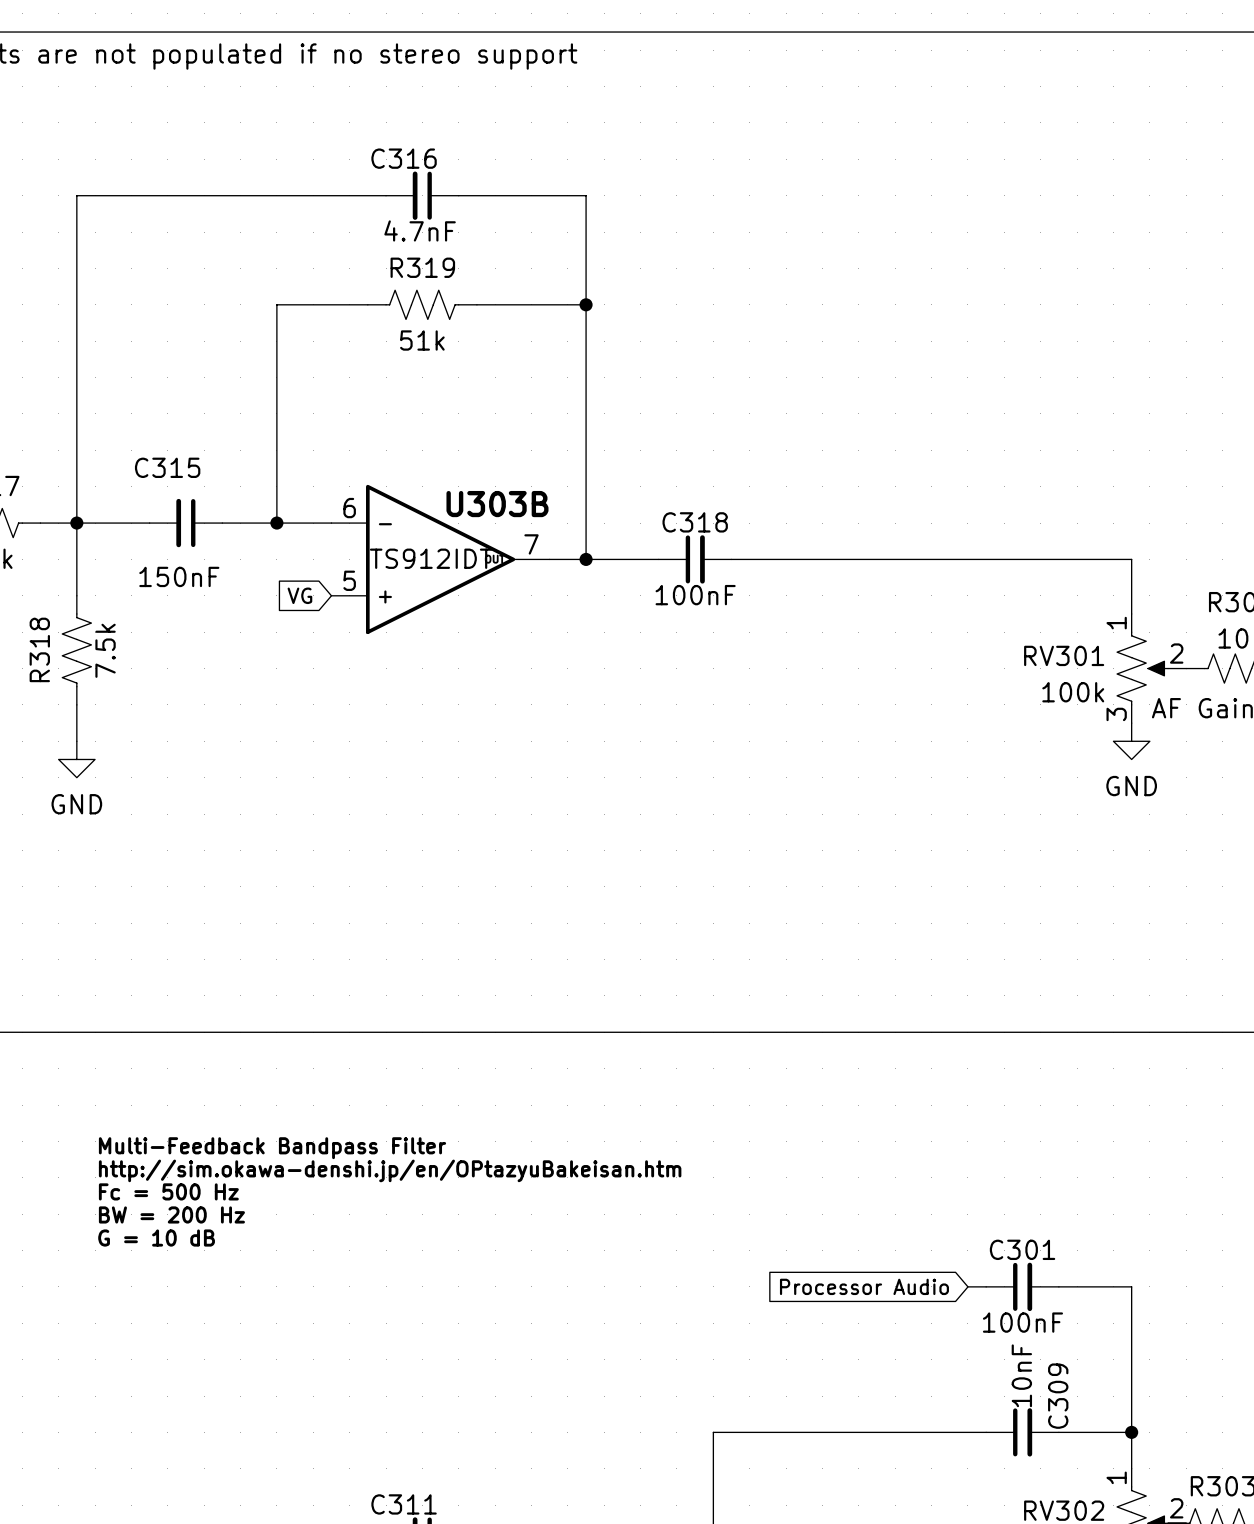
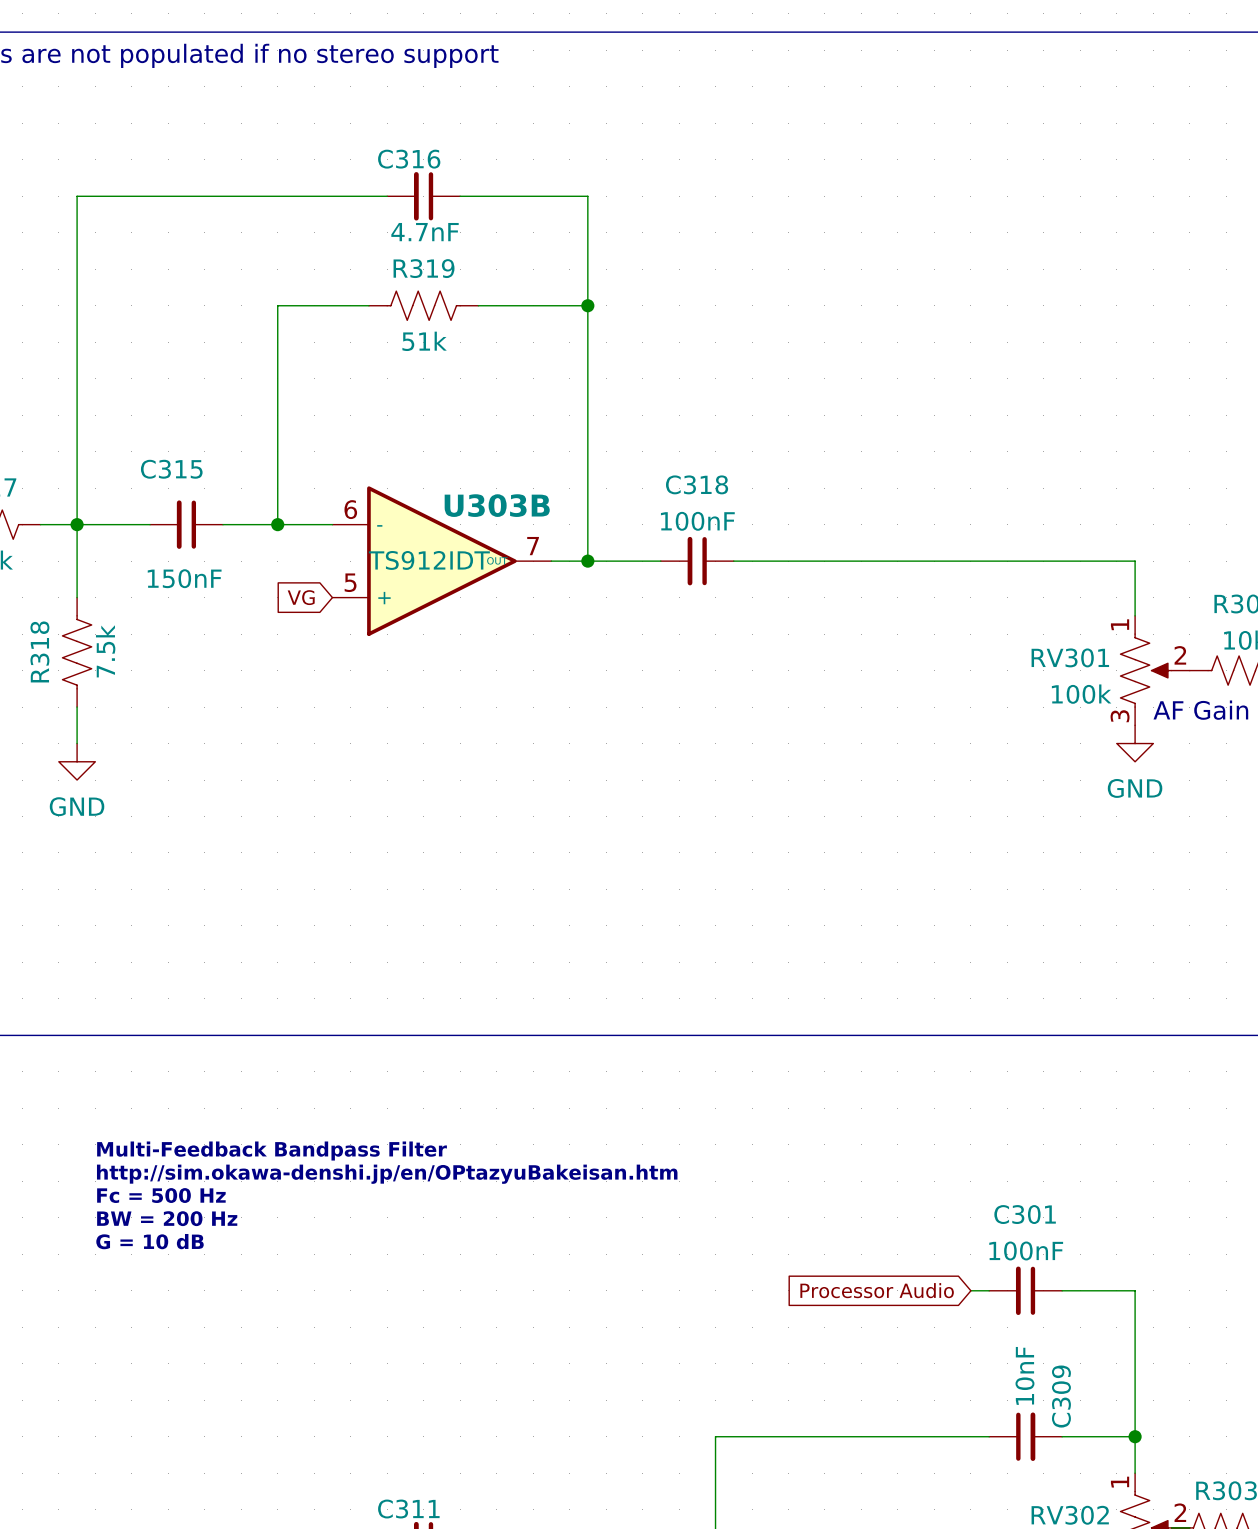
C318 name position: C318 (695, 522) -> C318 (697, 484)
C318 rotation: 0° (695, 559) -> 180° (697, 561)
C301 name position: C301 (1022, 1249) -> C301 (1025, 1214)
C301 rotation: 0° (1022, 1286) -> 180° (1025, 1290)

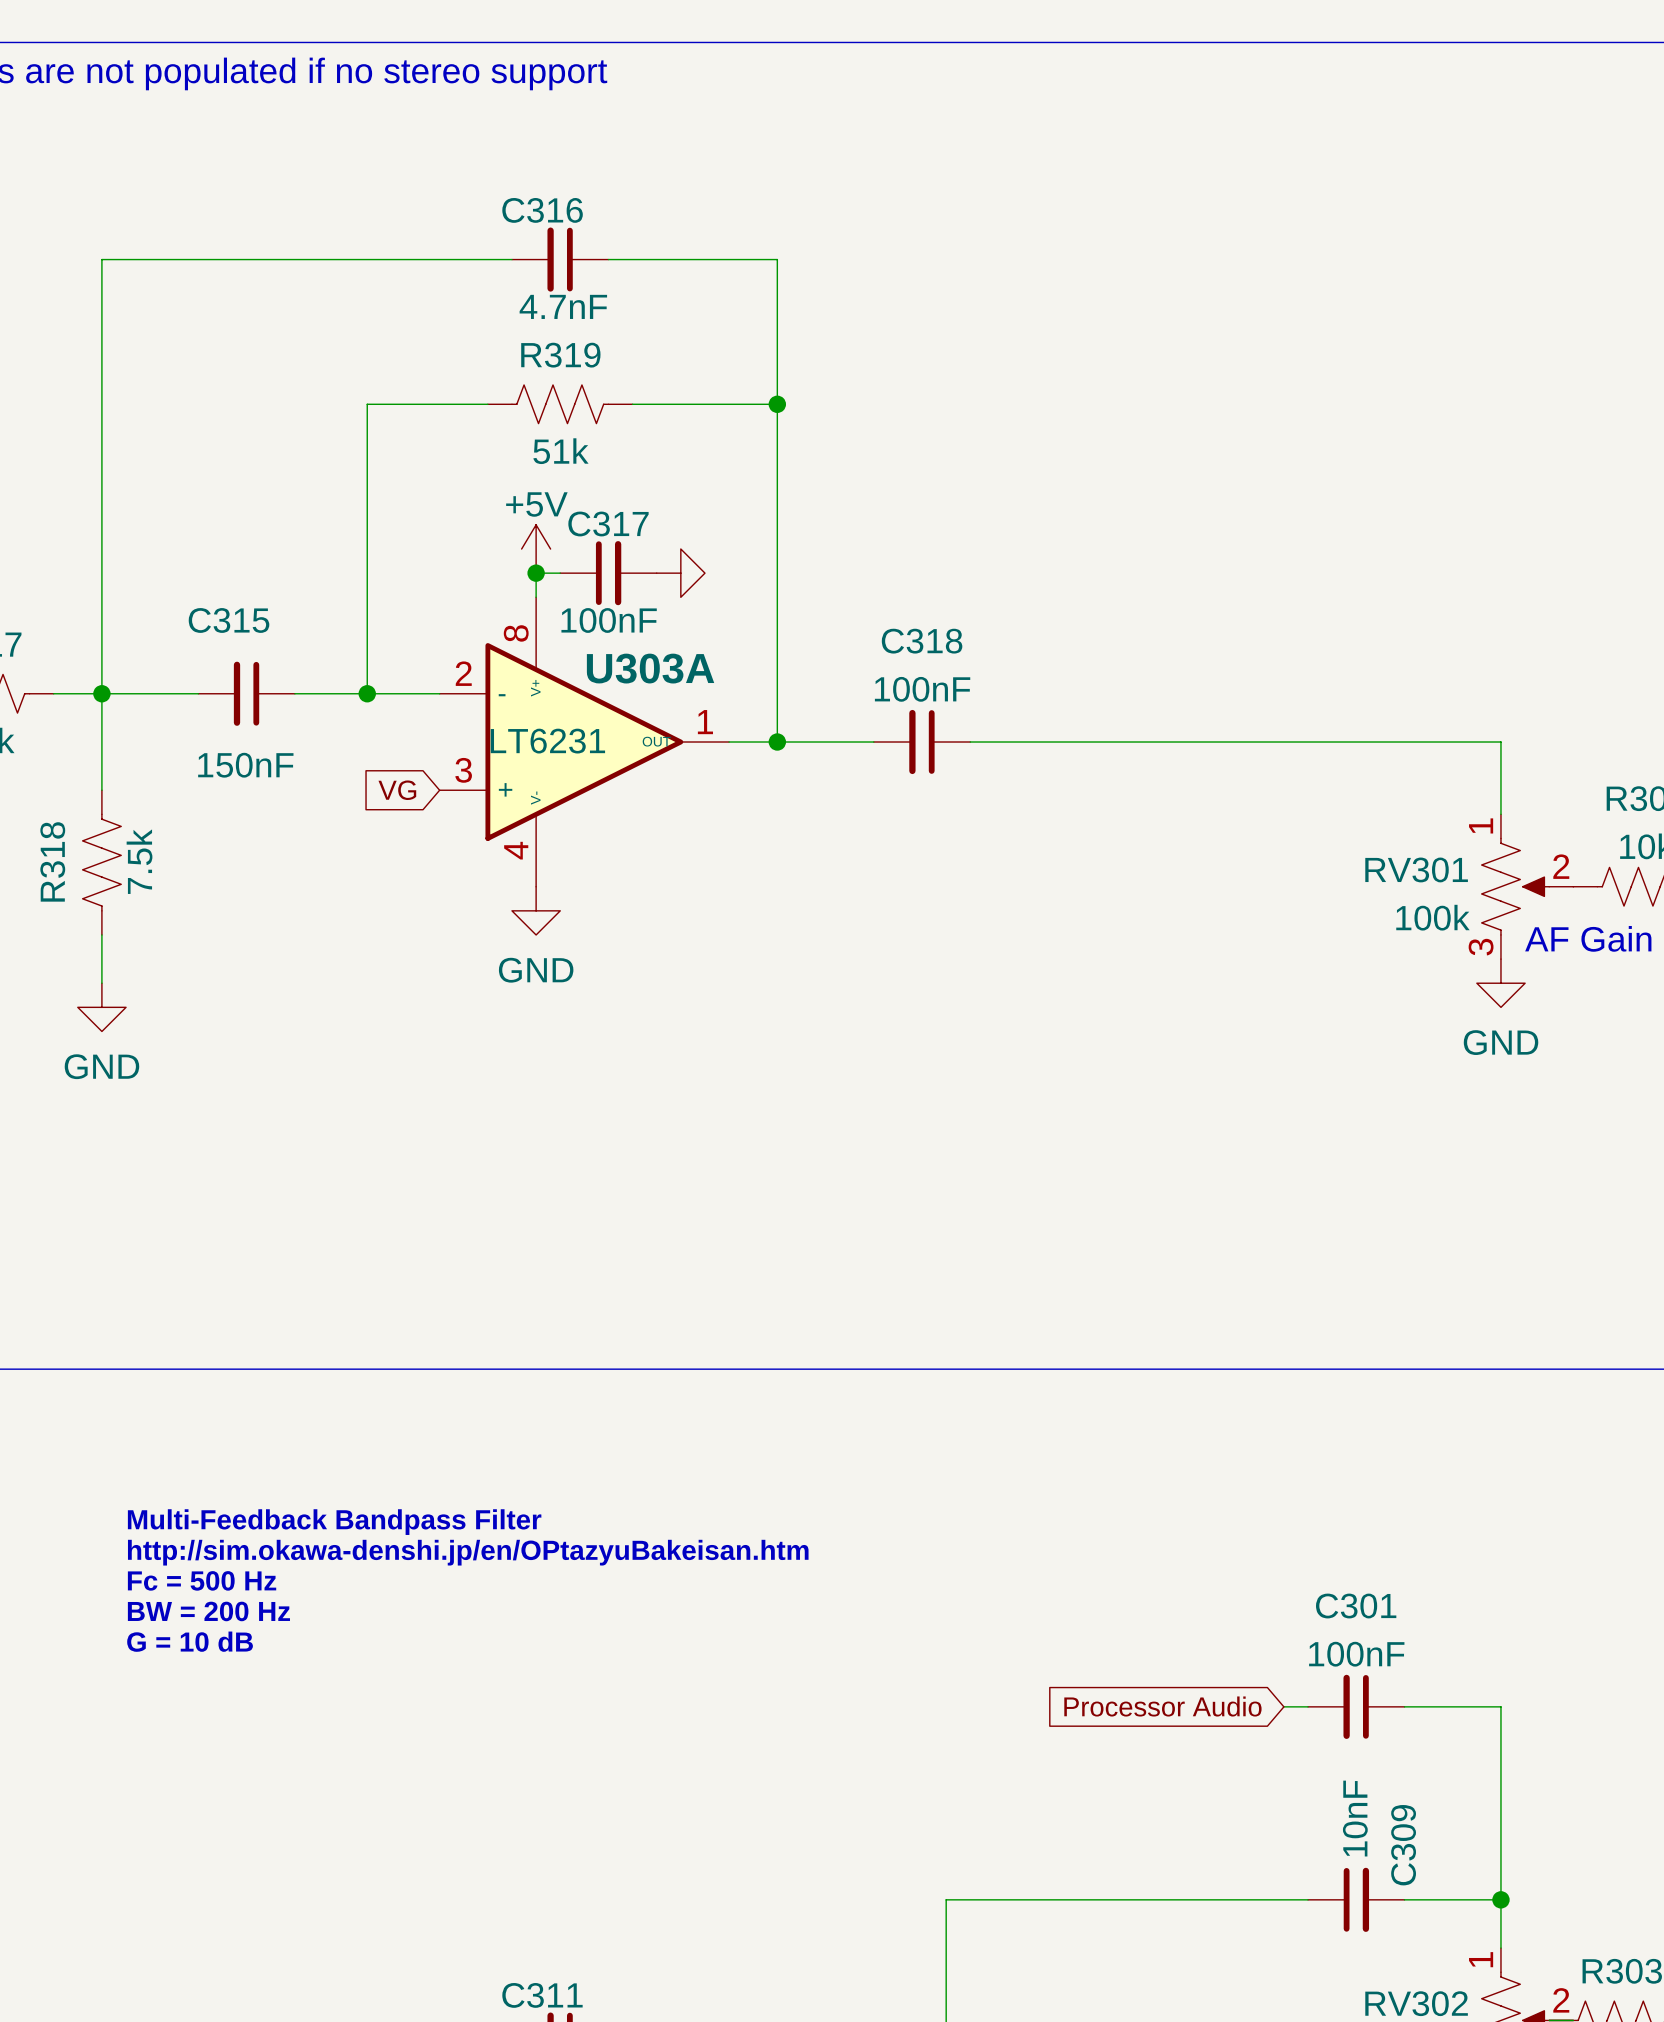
power symbol: none -> +5V (536, 549)
junction: none -> (536, 573)
wire: none -> (560, 573) (536, 573) (536, 597)
C317: none -> 100nF (608, 573)
power symbol: none -> (680, 573)
U303B: TS912IDT (441, 561) -> none
U303A: none -> LT6231 (584, 742)
power symbol: none -> GND (536, 910)

